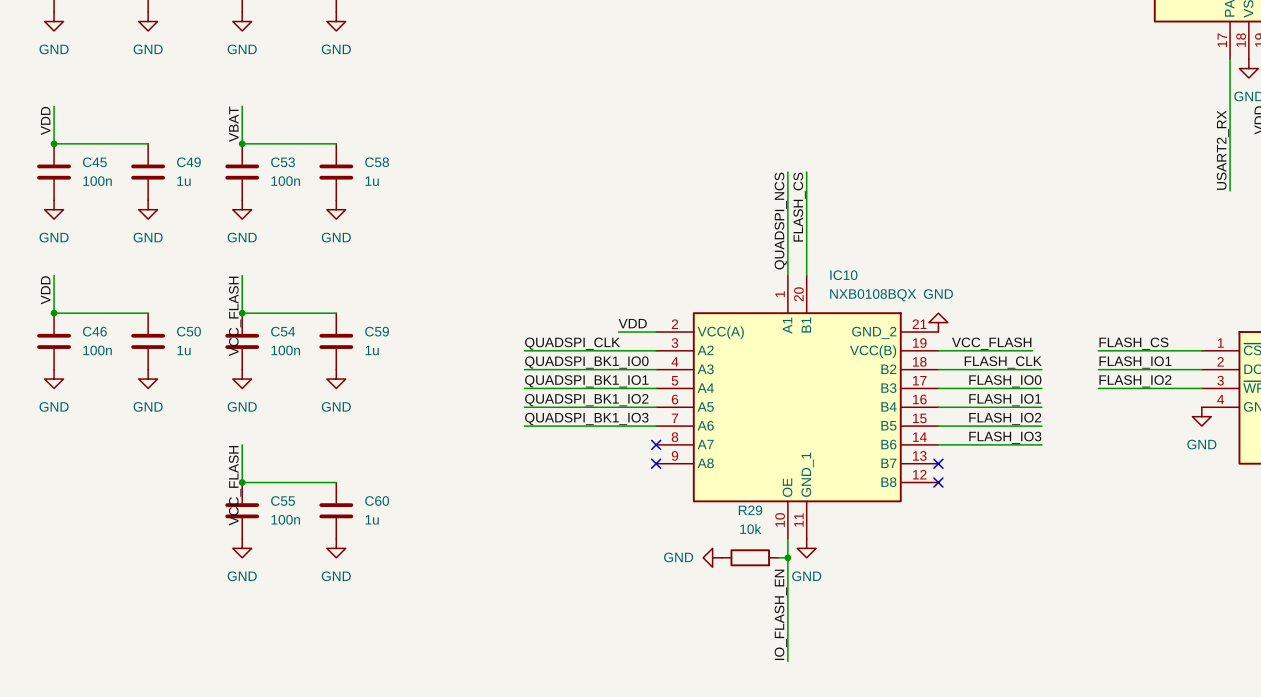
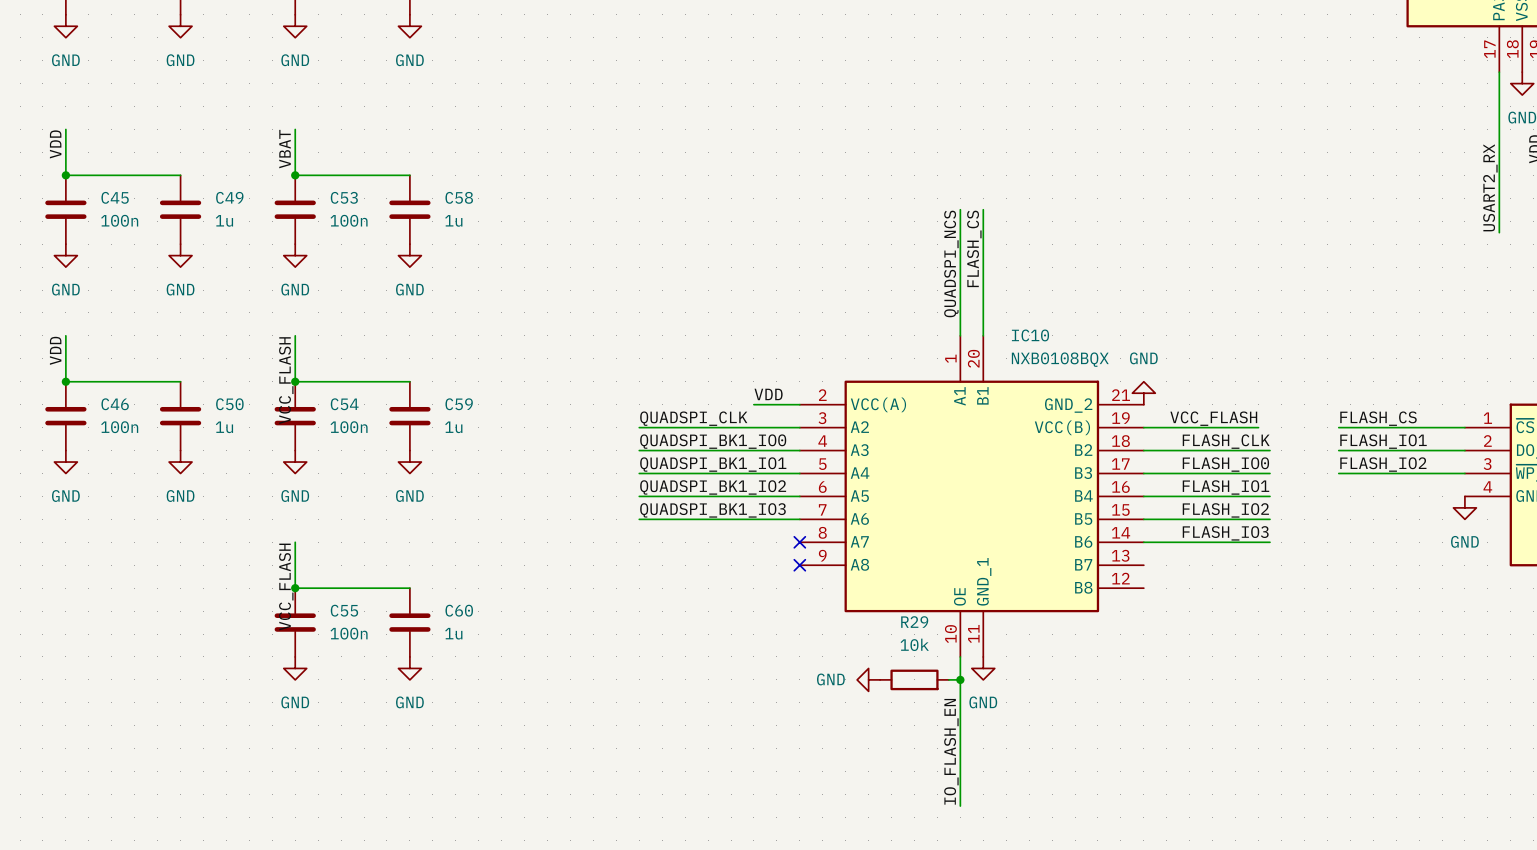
no-connect mark: (938, 463) -> none
no-connect mark: (938, 482) -> none

